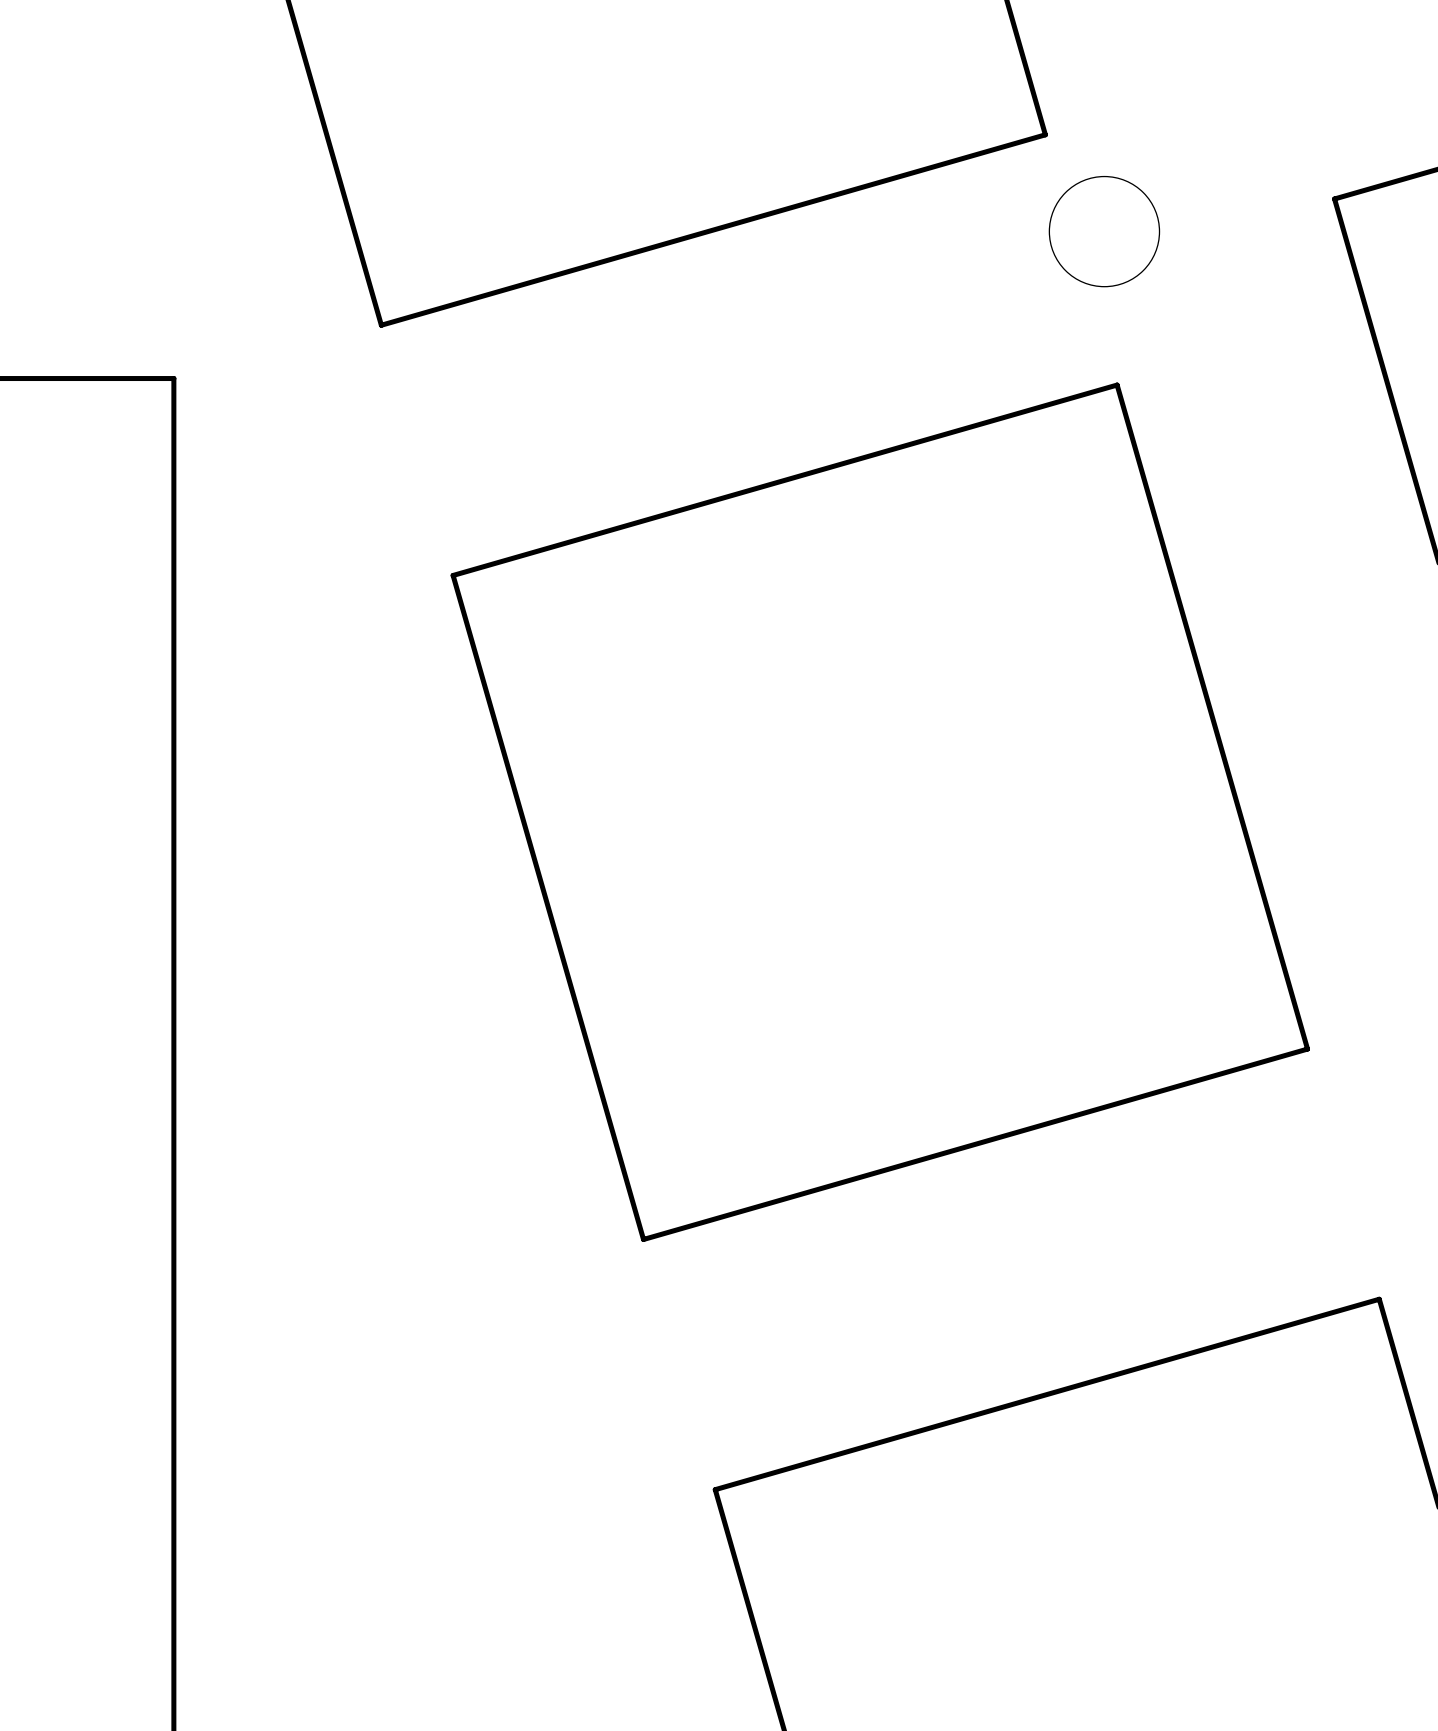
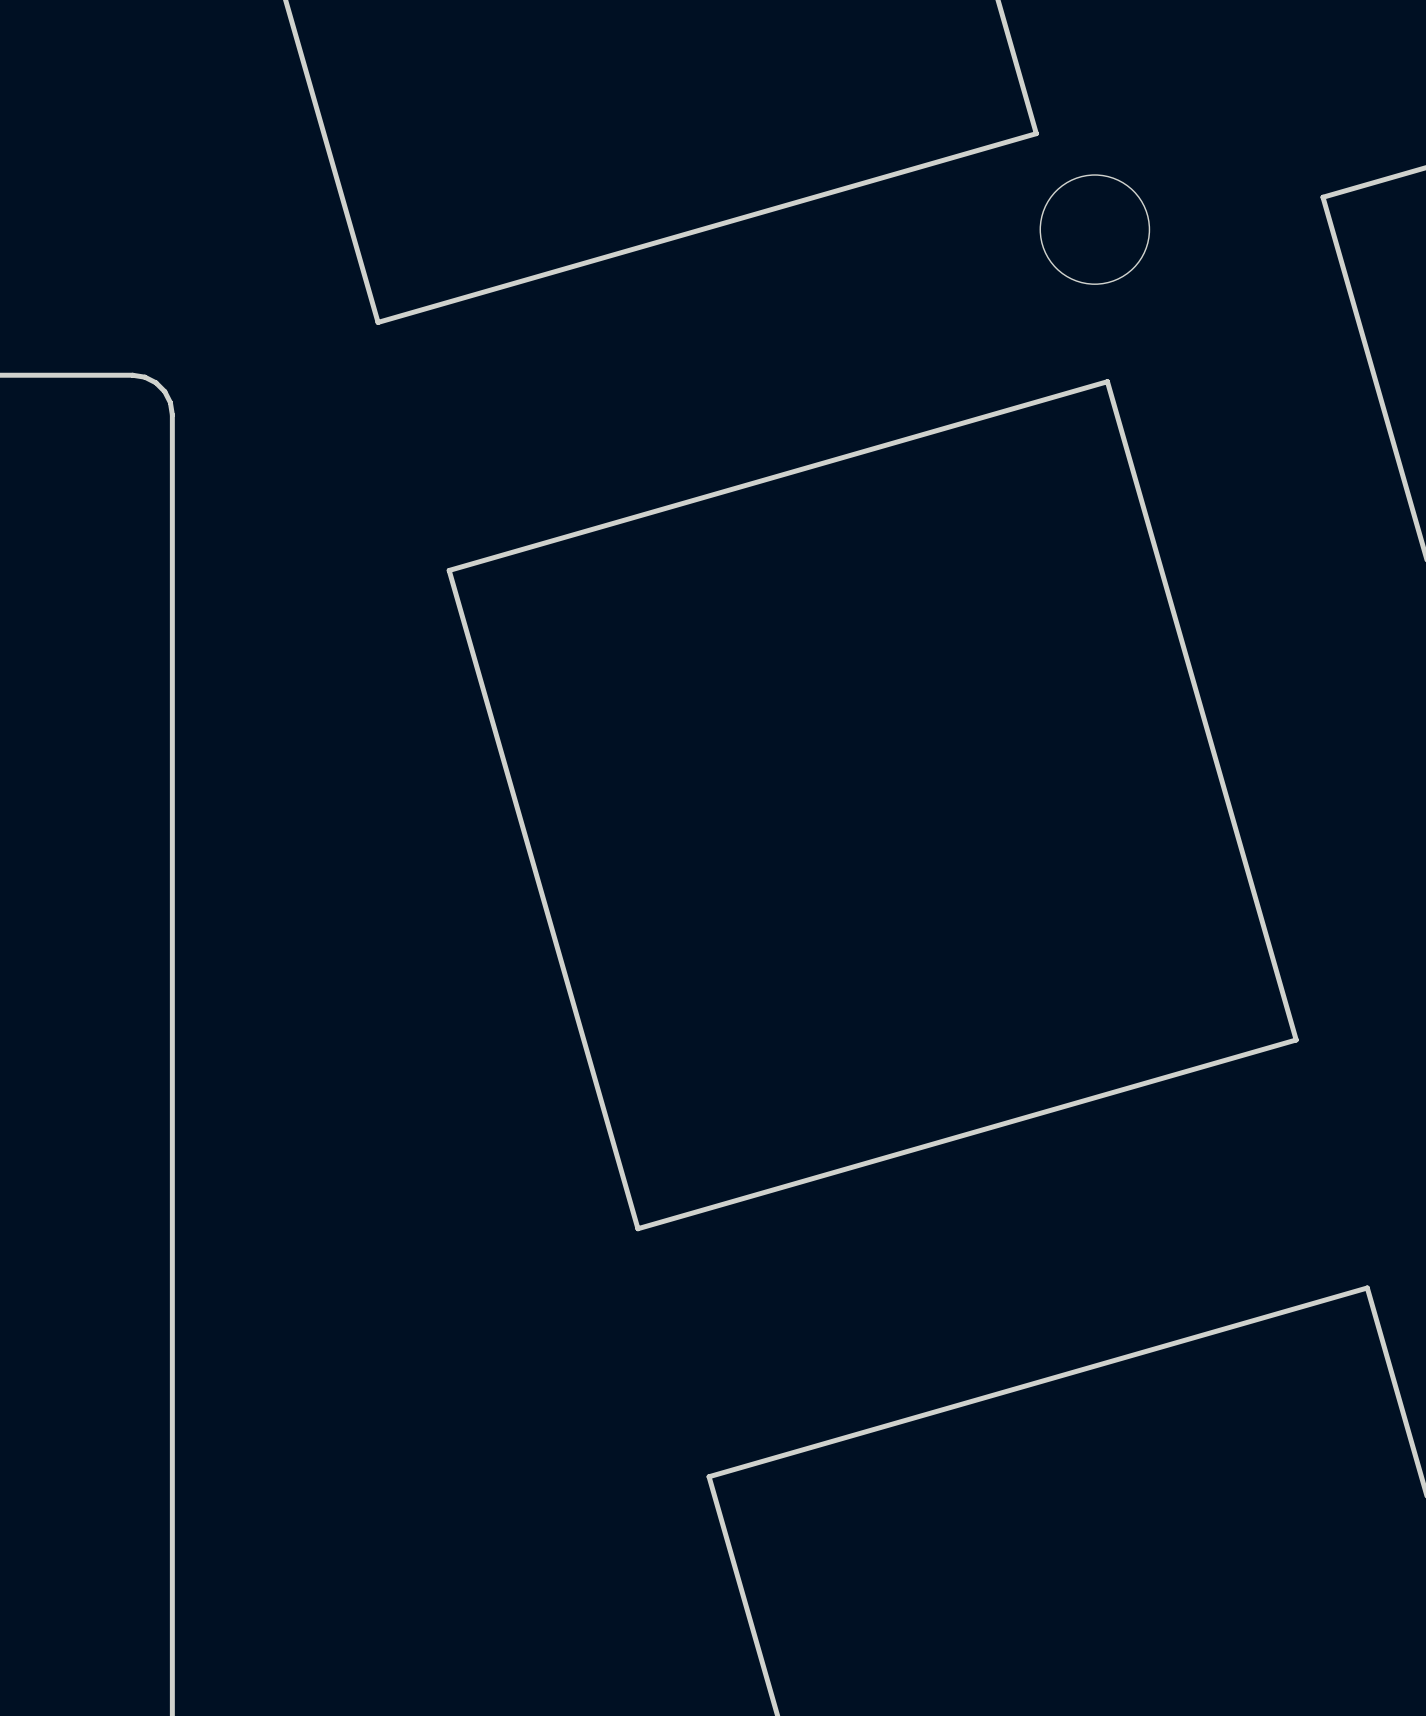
board edge: (133, 378) (173, 378) (173, 418) -> (132, 375) (144, 377) (156, 382) (164, 391) (170, 402) (172, 414)

